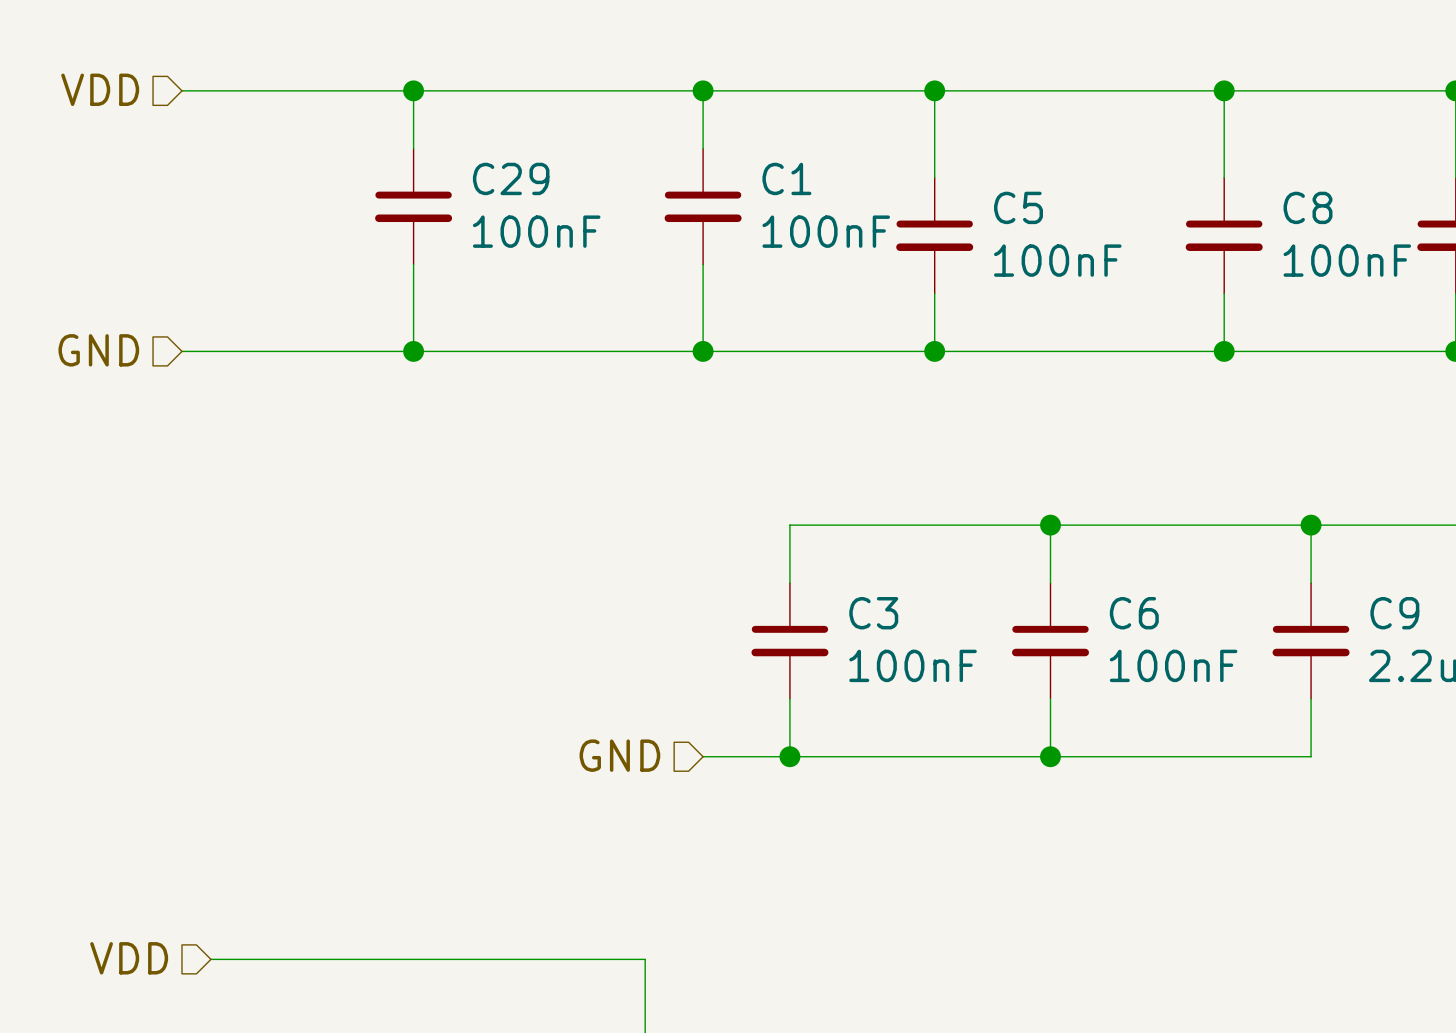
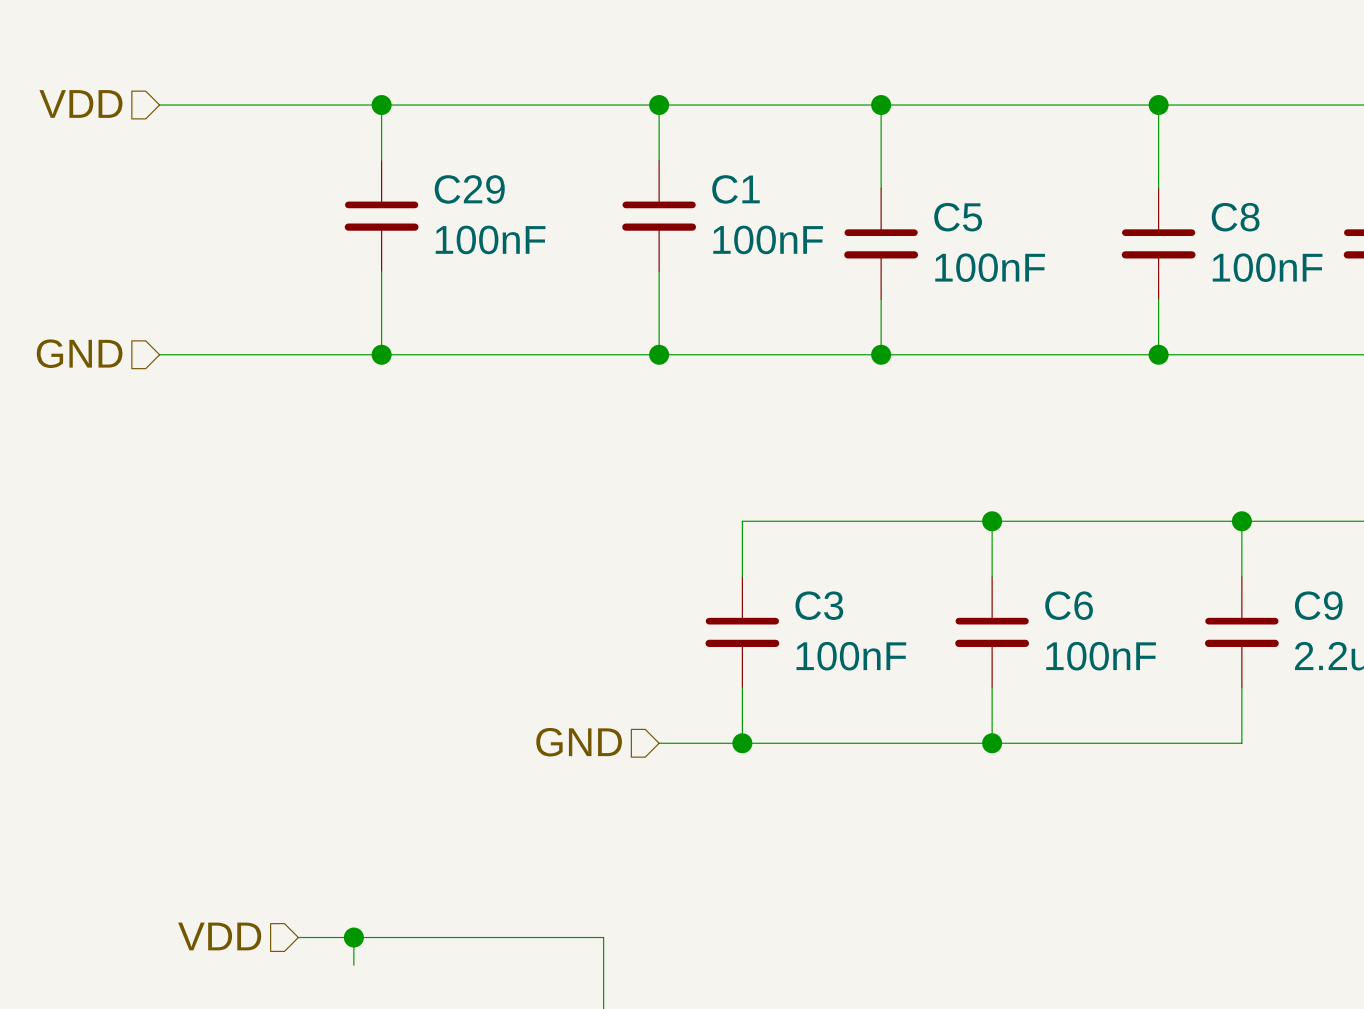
hierarchical label position: VDD (129, 958) -> VDD (219, 936)
wire: (210, 959) (326, 959) -> none
wire: none -> (353, 937) (353, 965)
junction: none -> (353, 937)

